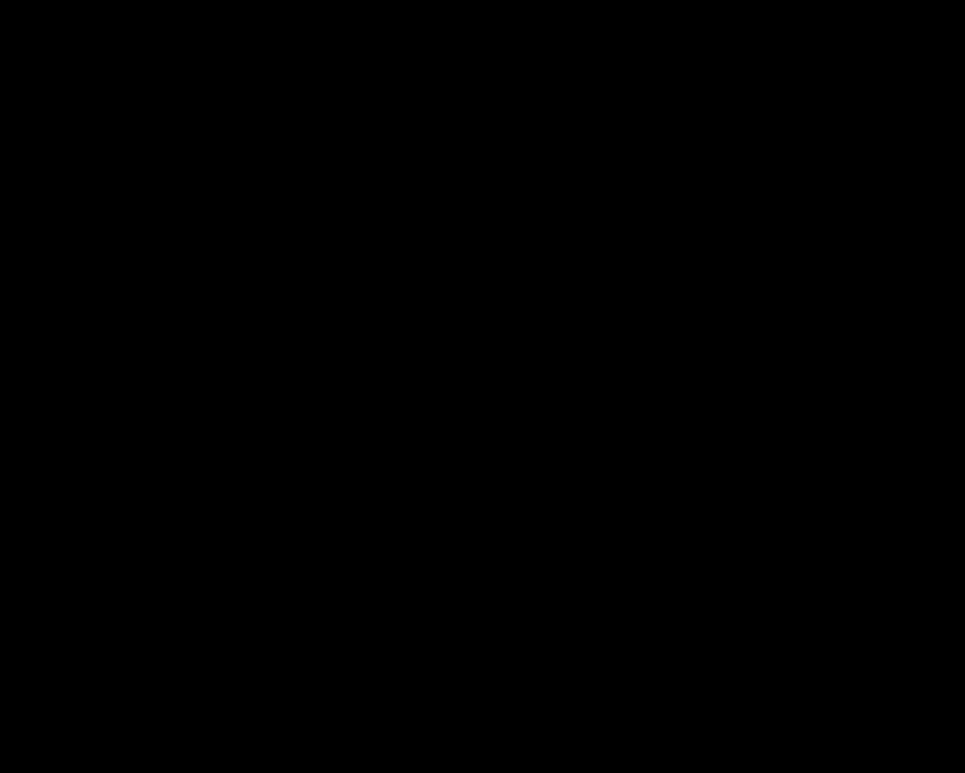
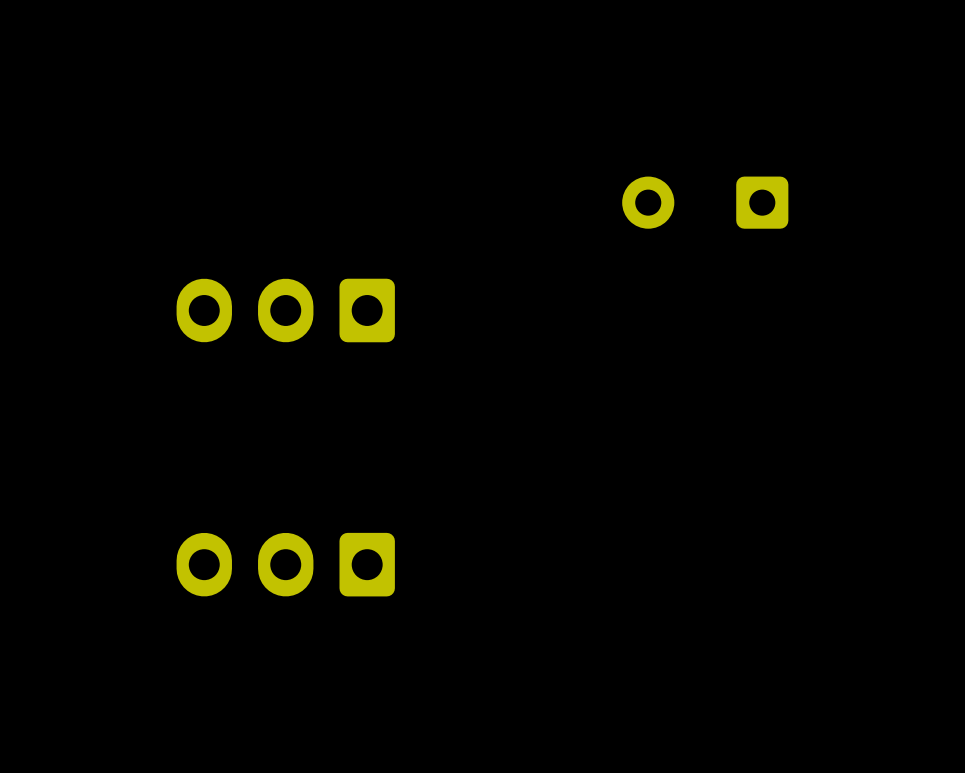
part: none -> (705, 202)
part: none -> (285, 310)
part: none -> (285, 564)

